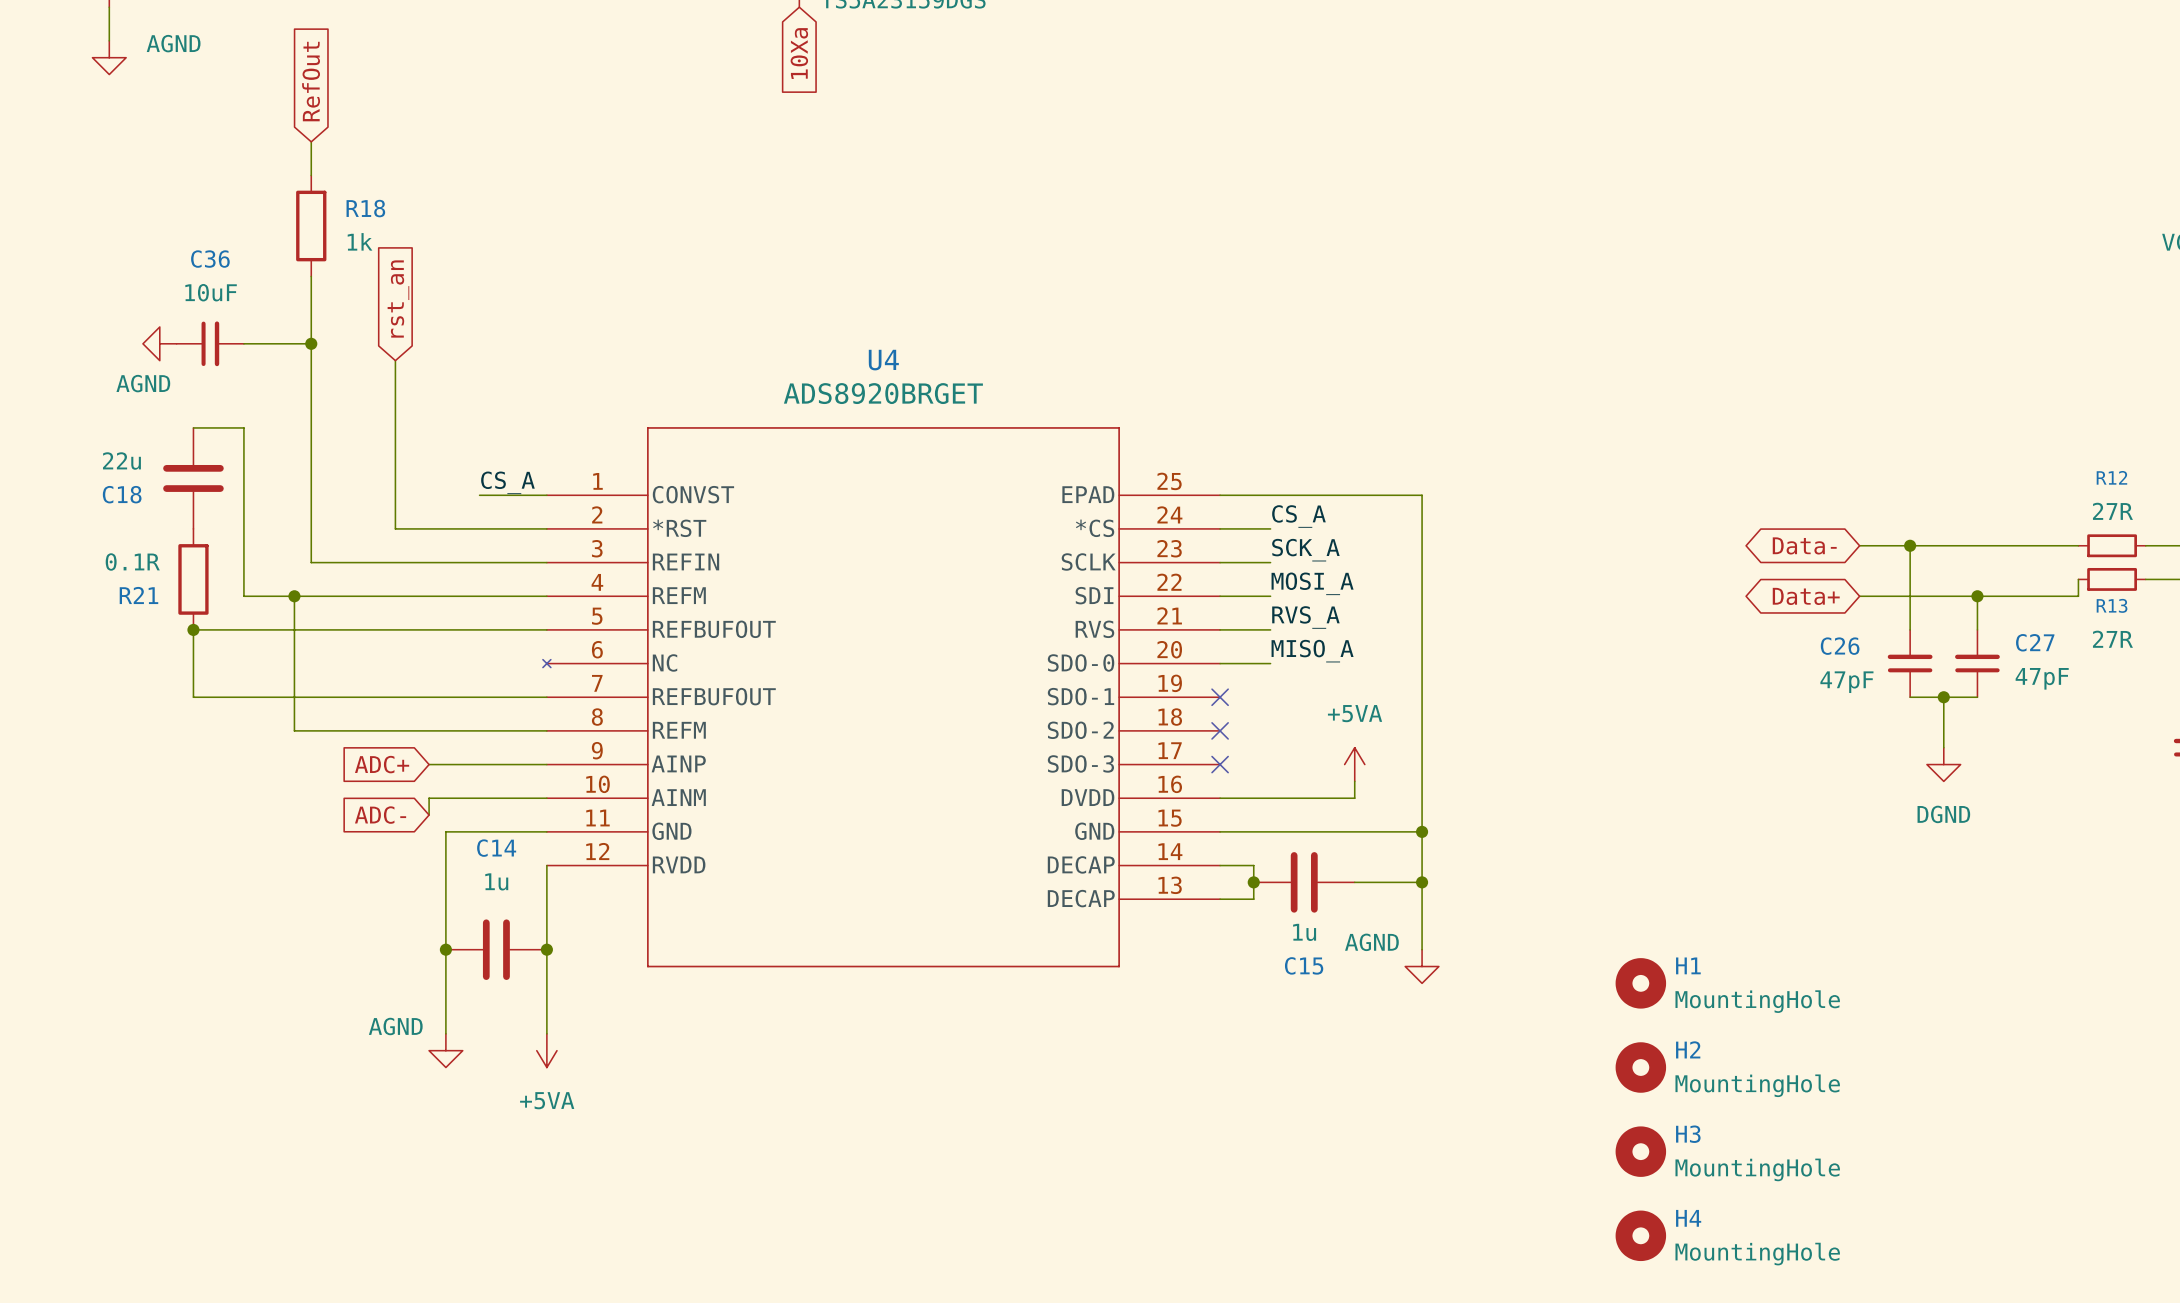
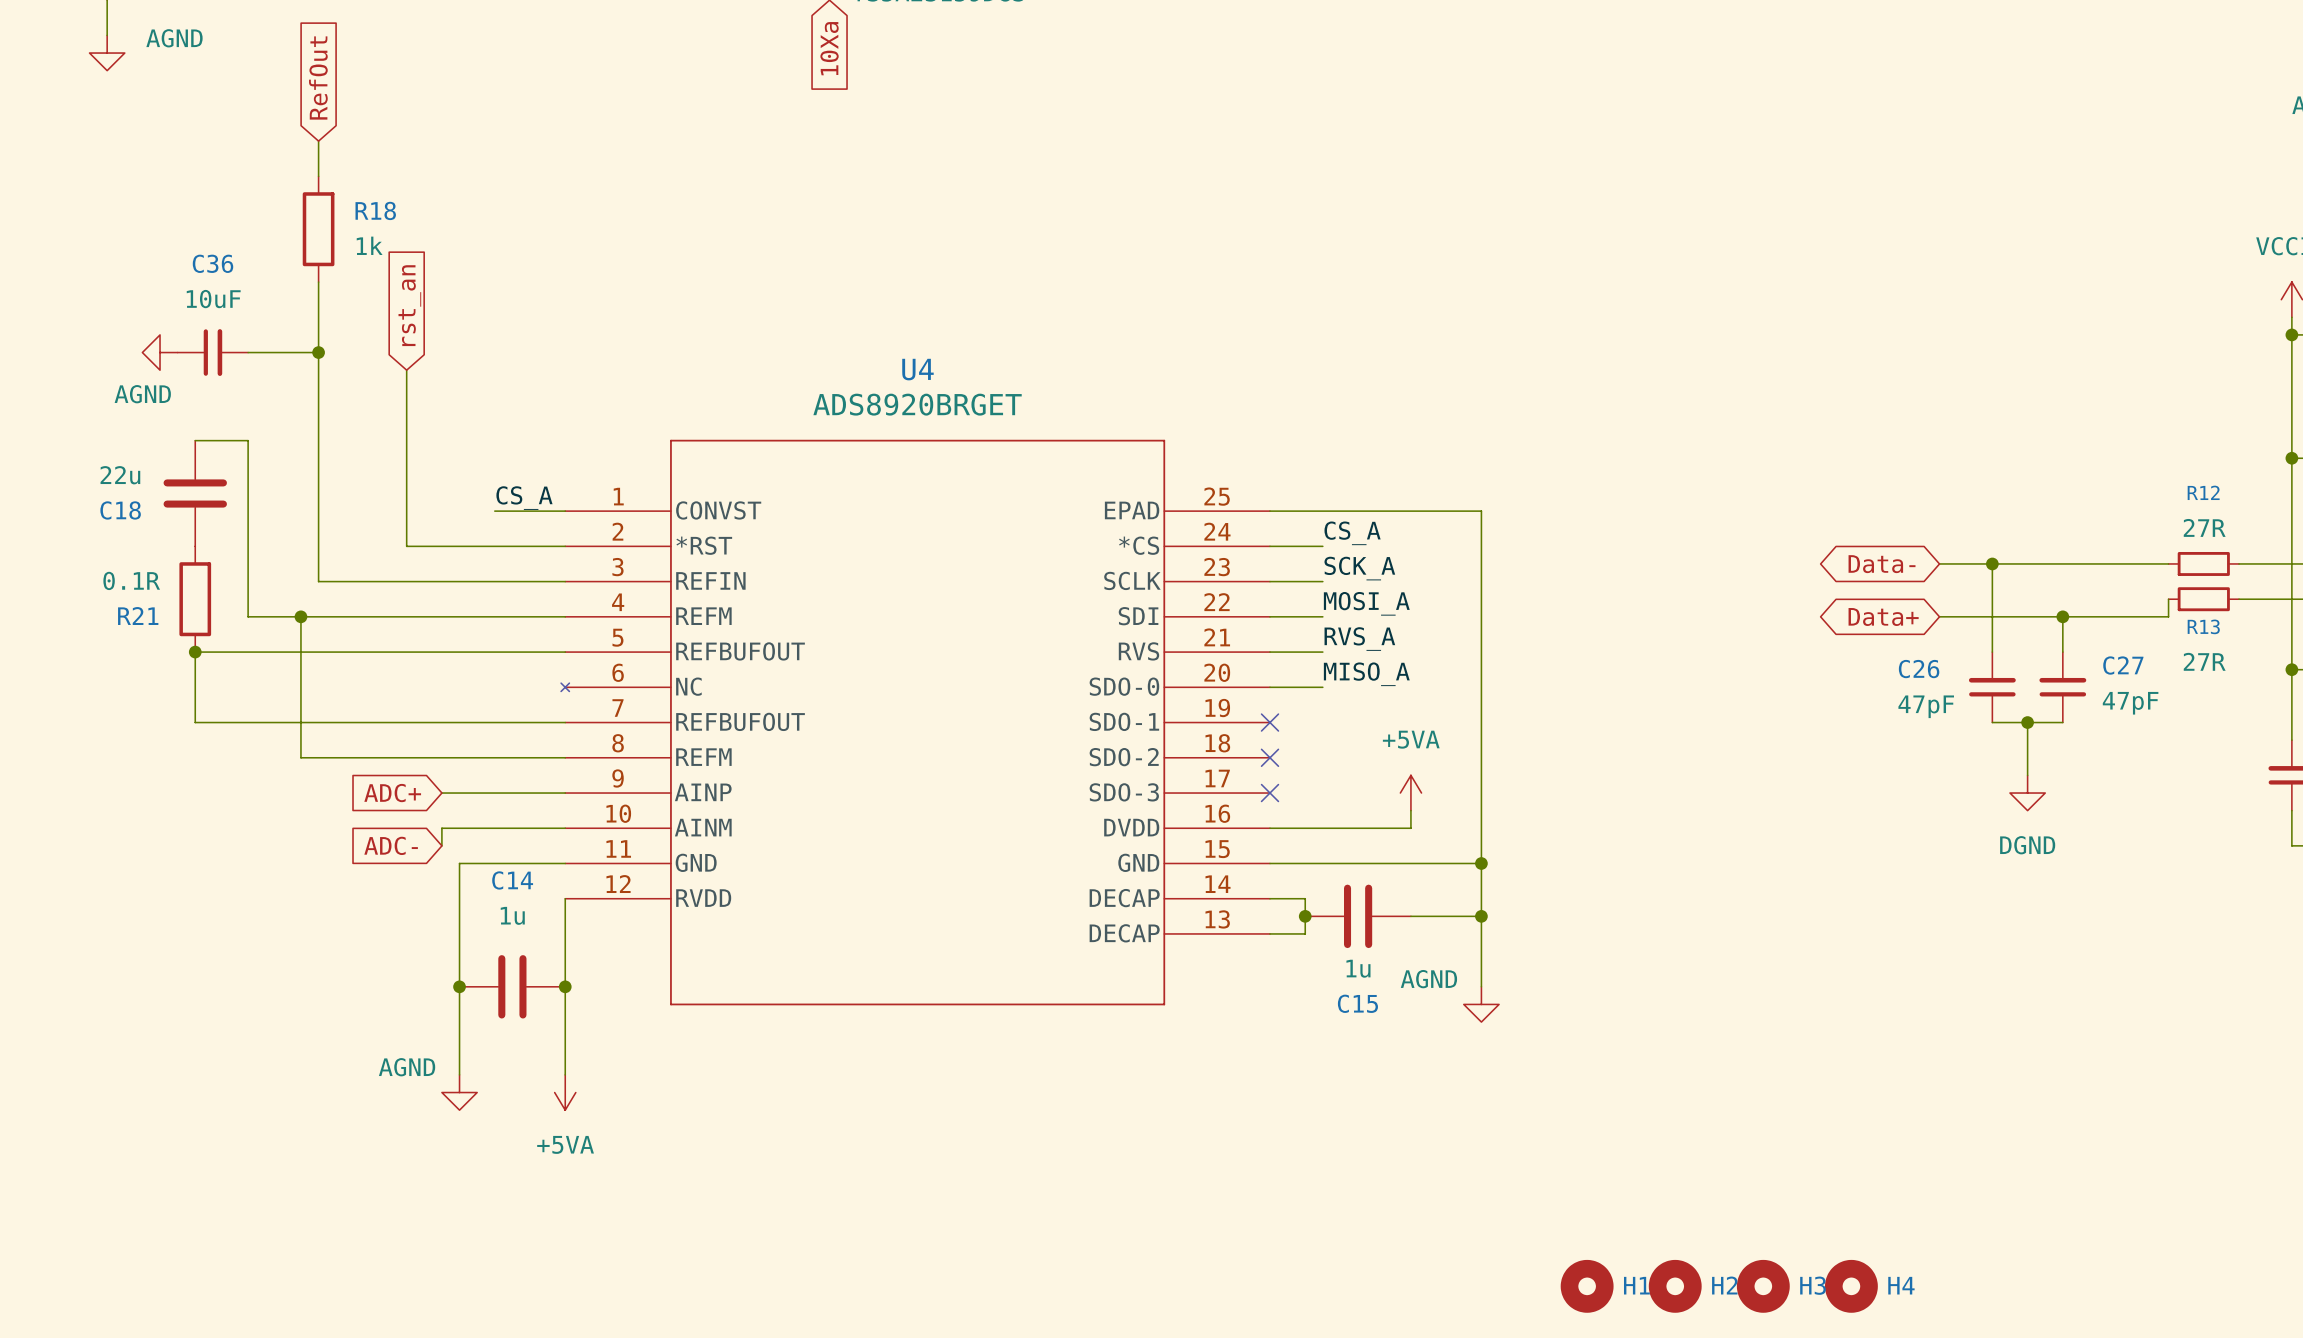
H1 name position: H1 (1688, 965) -> H1 (1636, 1285)
H1 position: (1640, 983) -> (1587, 1286)
H1 value: MountingHole (1757, 1001) -> none
H2 name position: H2 (1688, 1049) -> H2 (1724, 1285)
H2 position: (1640, 1067) -> (1675, 1286)
H2 value: MountingHole (1757, 1085) -> none
H3 name position: H3 (1688, 1134) -> H3 (1813, 1285)
H3 position: (1640, 1151) -> (1763, 1286)
H3 value: MountingHole (1757, 1169) -> none
H4 name position: H4 (1688, 1218) -> H4 (1901, 1285)
H4 position: (1640, 1235) -> (1851, 1286)
H4 value: MountingHole (1757, 1254) -> none

